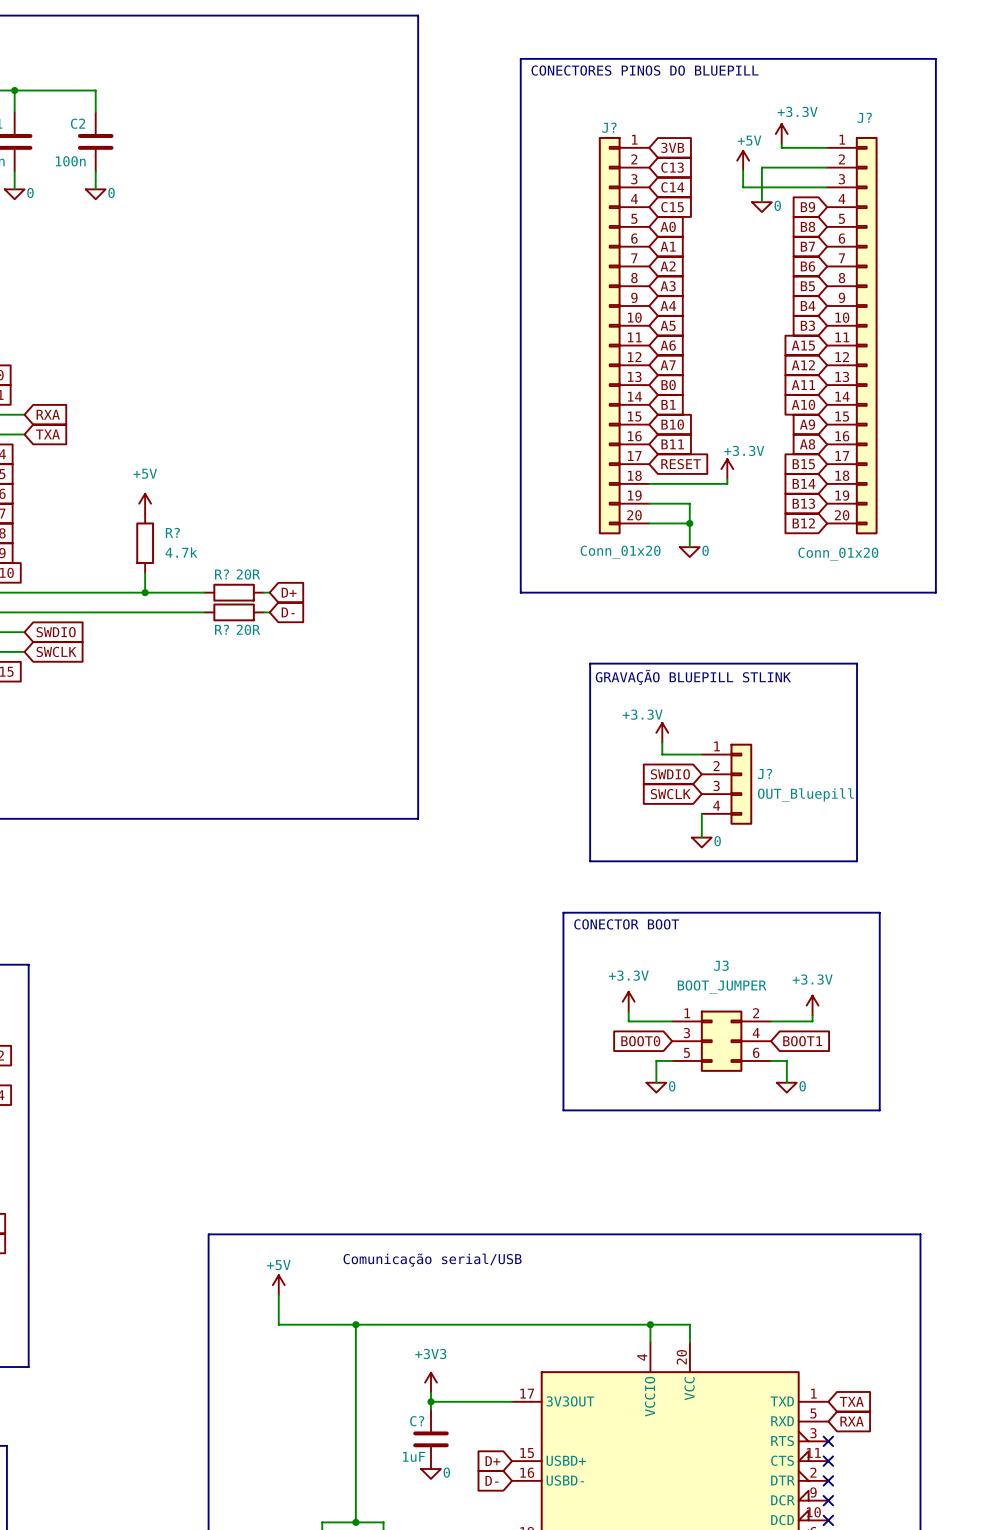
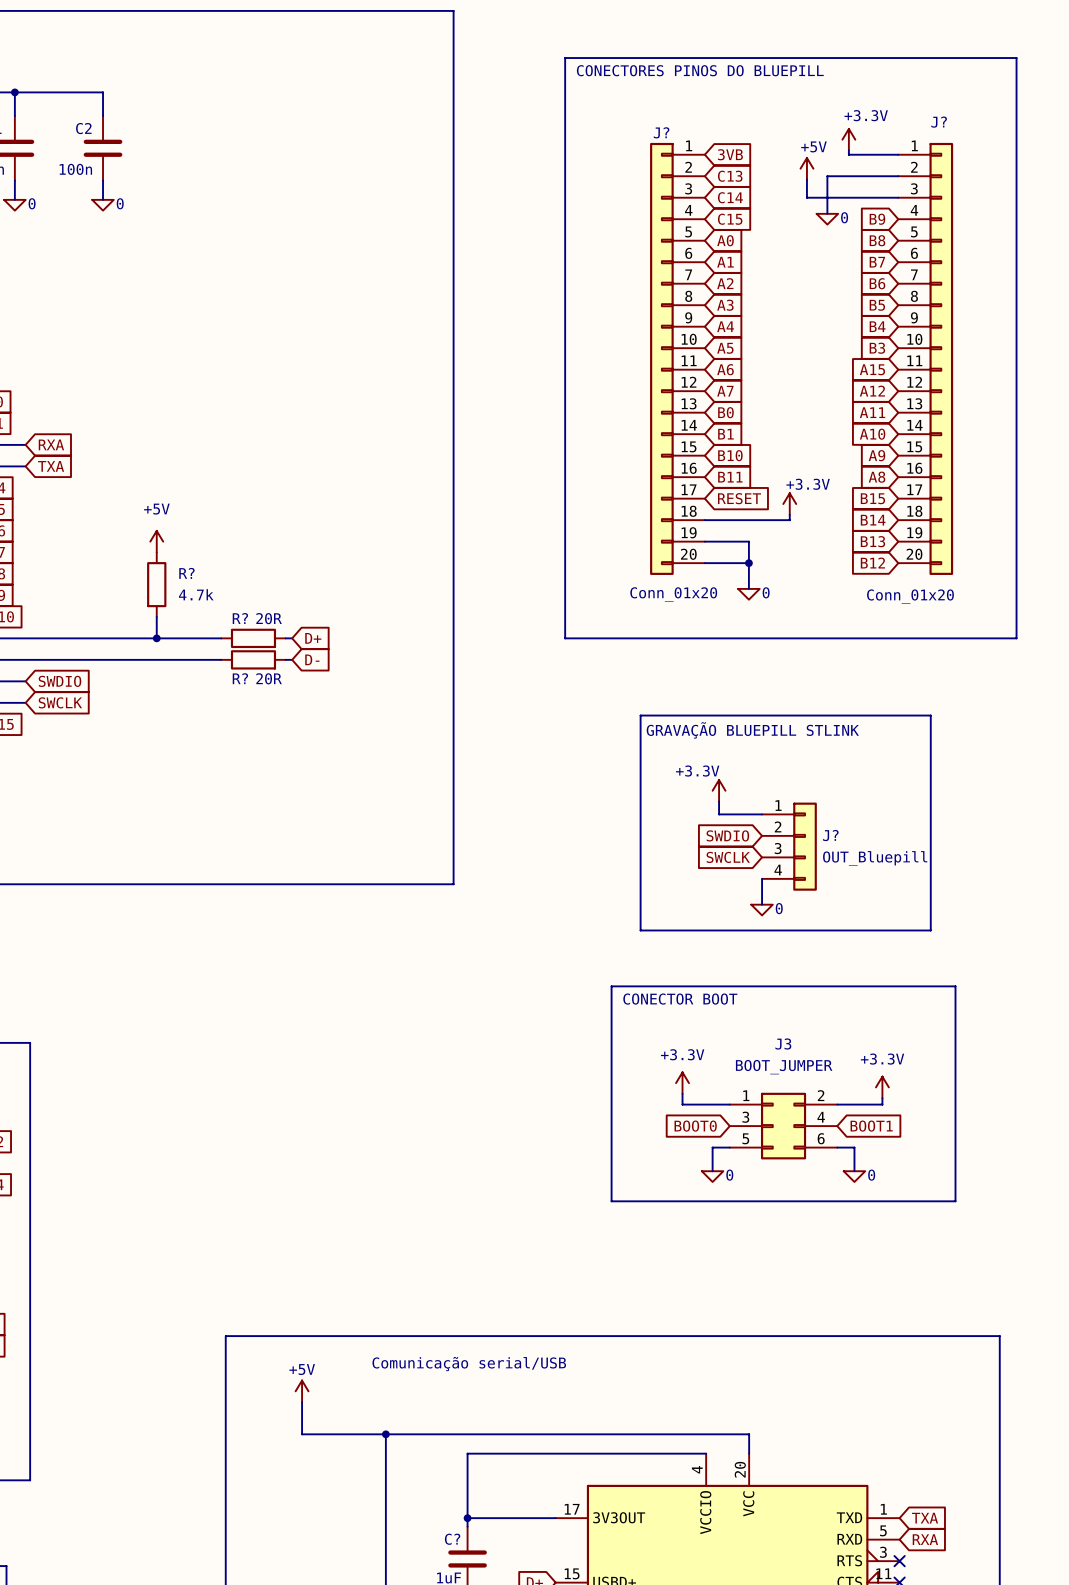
wire: (650, 1324) (650, 1342) -> (467, 1508) (467, 1453) (706, 1453)
junction: (650, 1324) -> none
power symbol: +3V3 (430, 1382) -> none

